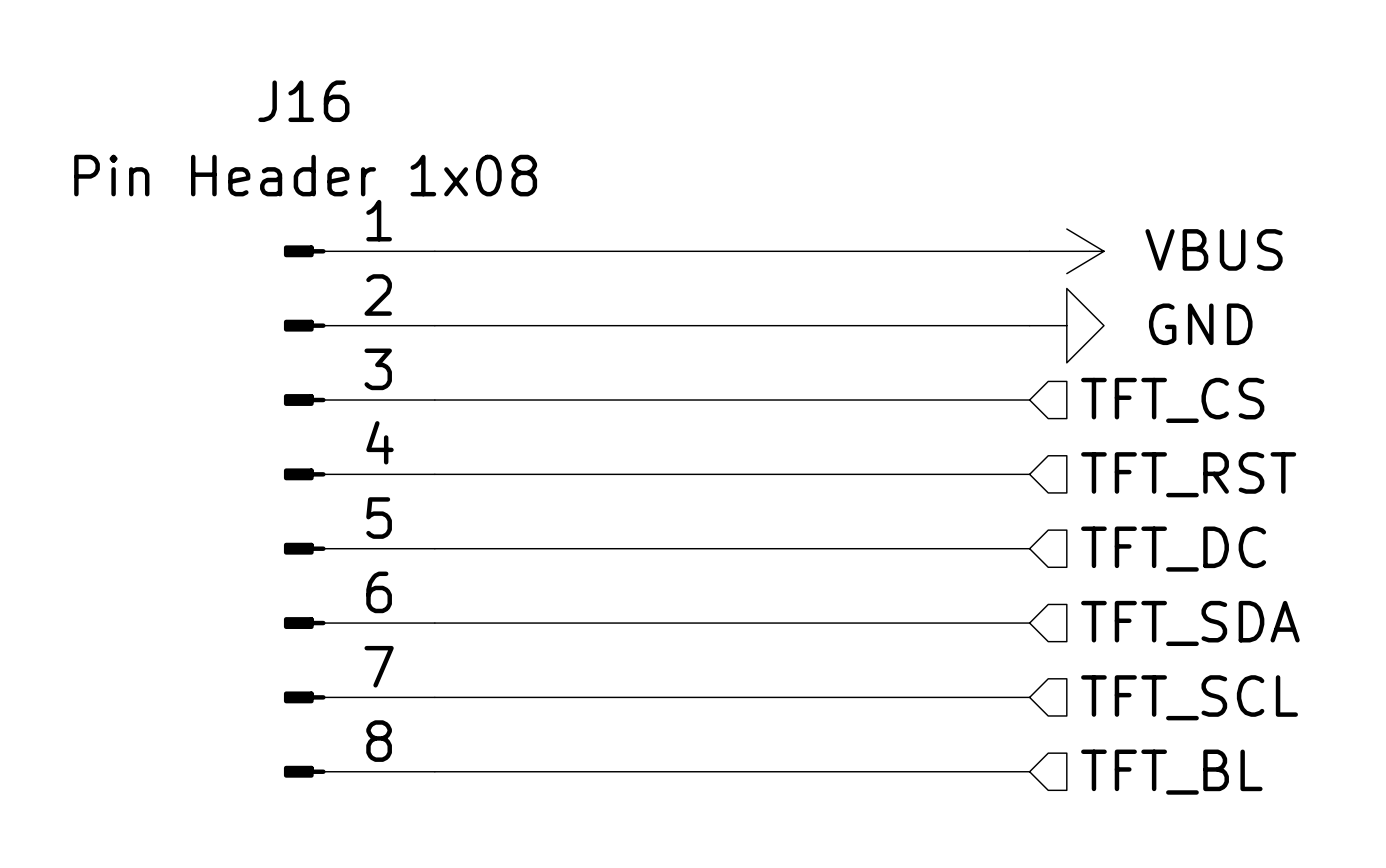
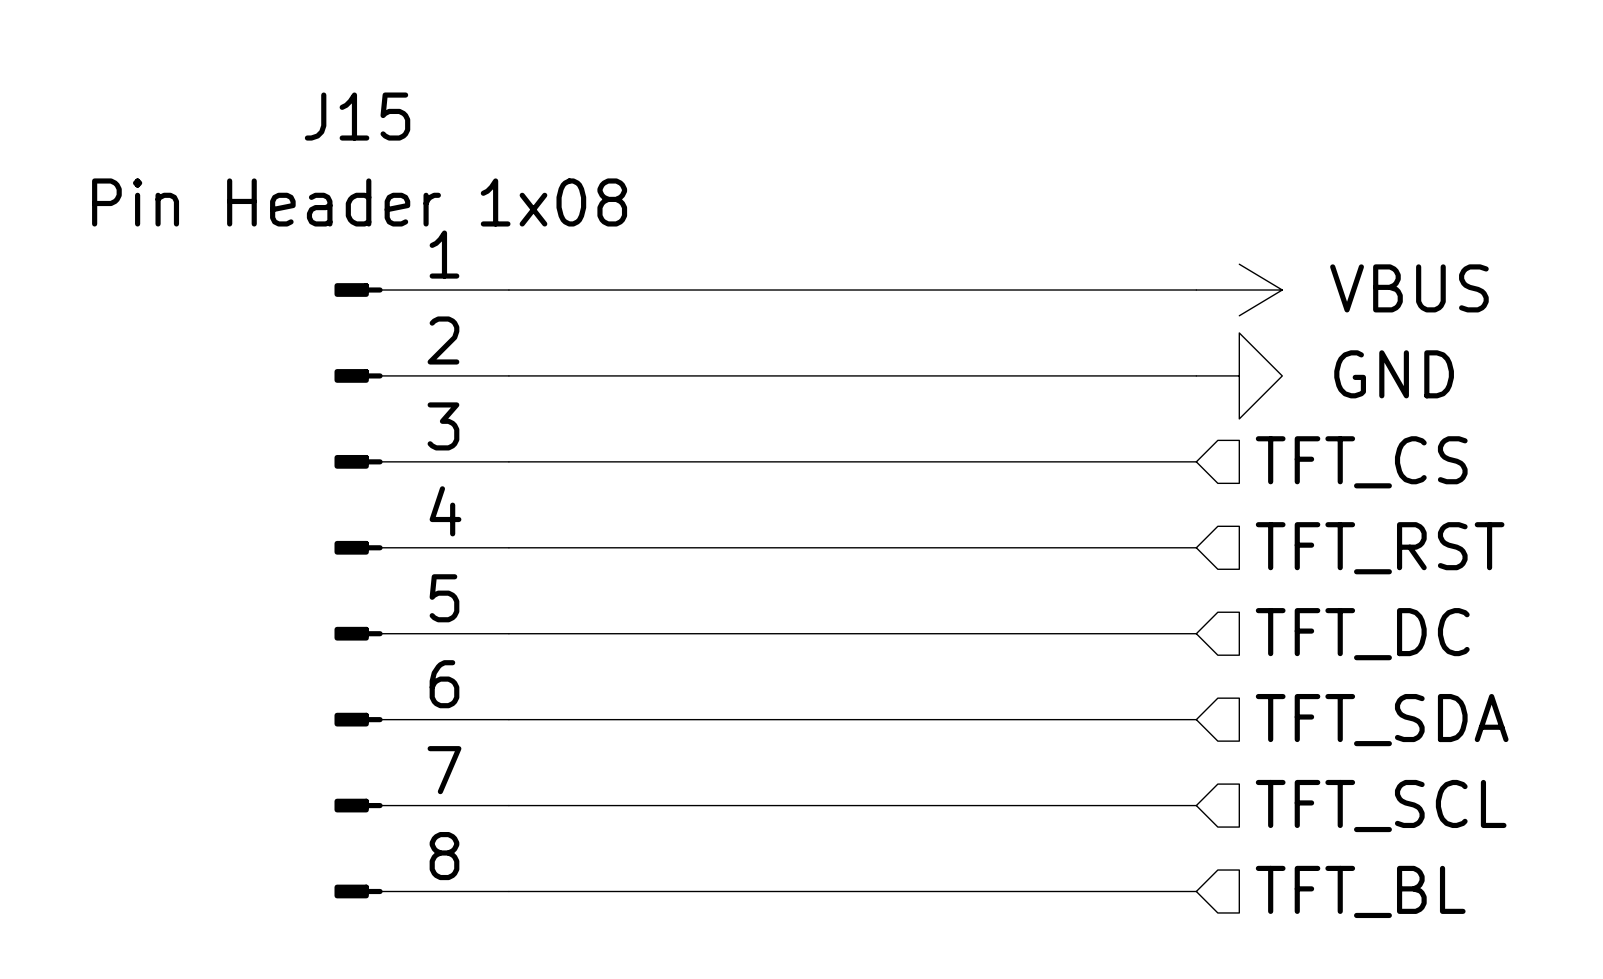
J16 name: J16 (303, 101) -> J15 (357, 116)

